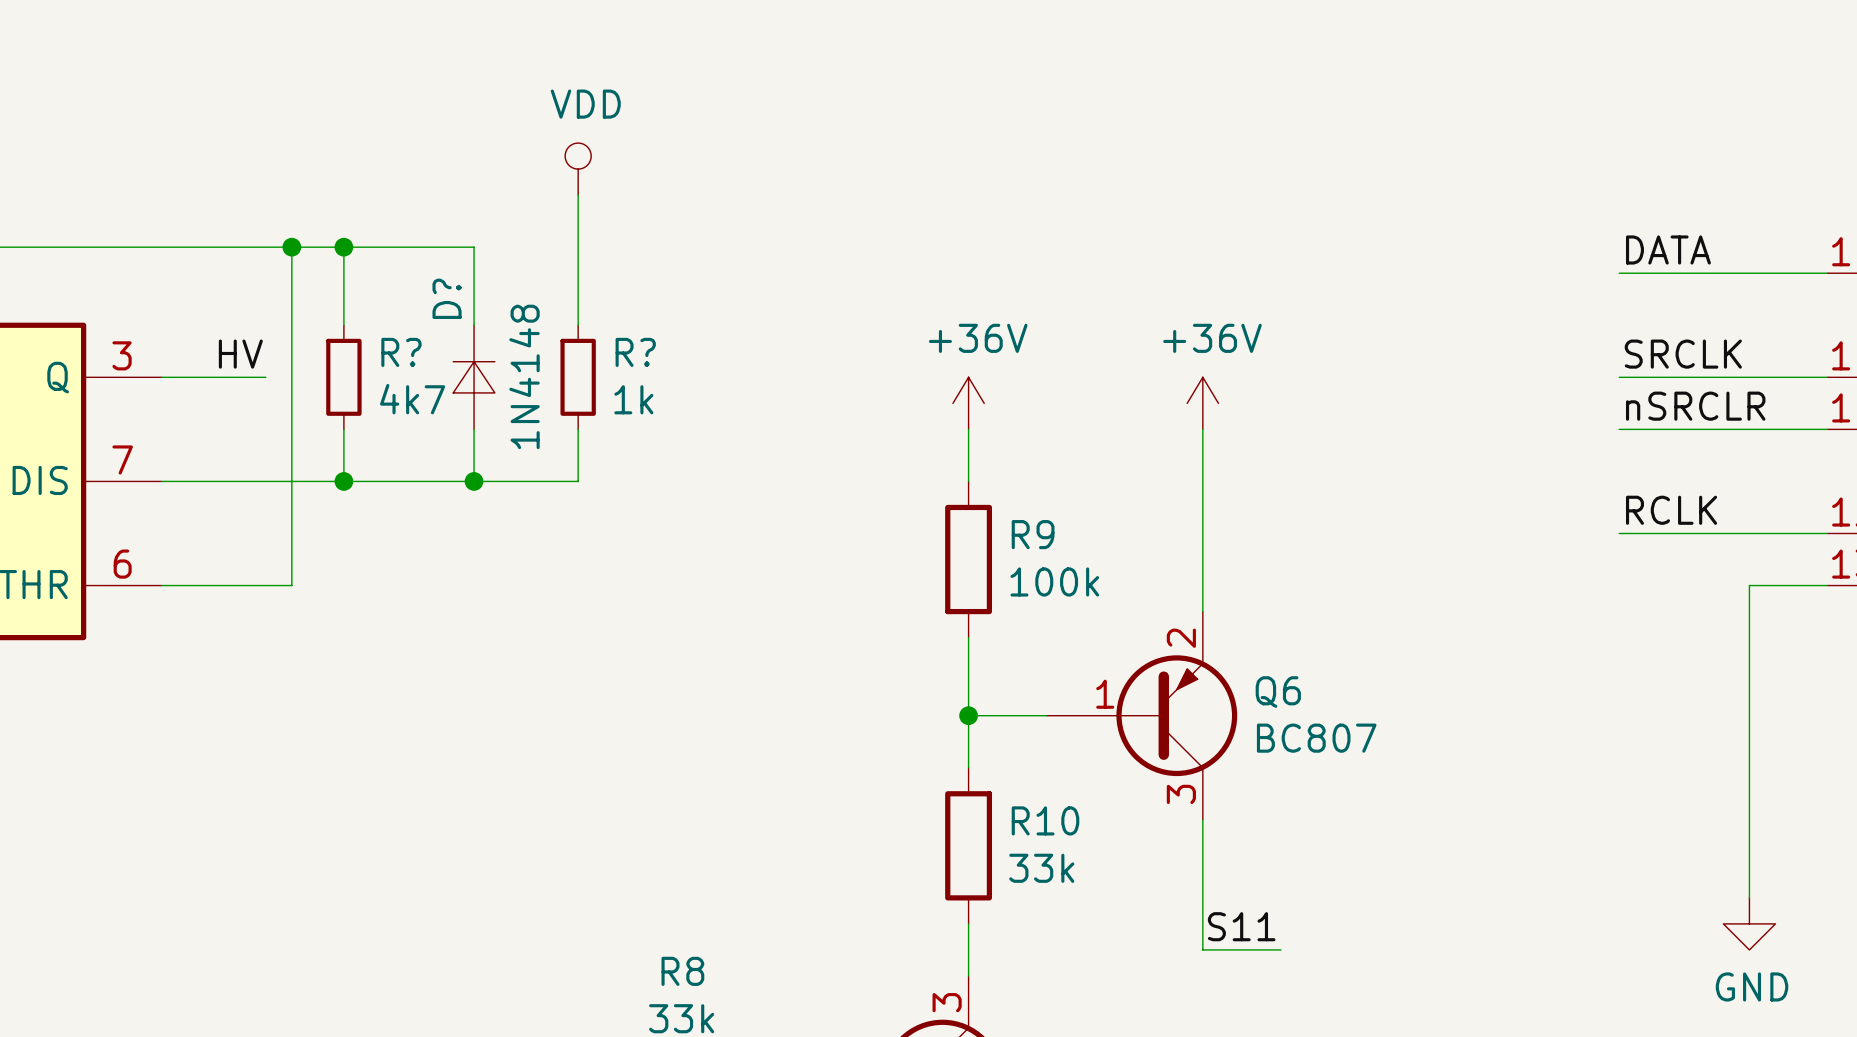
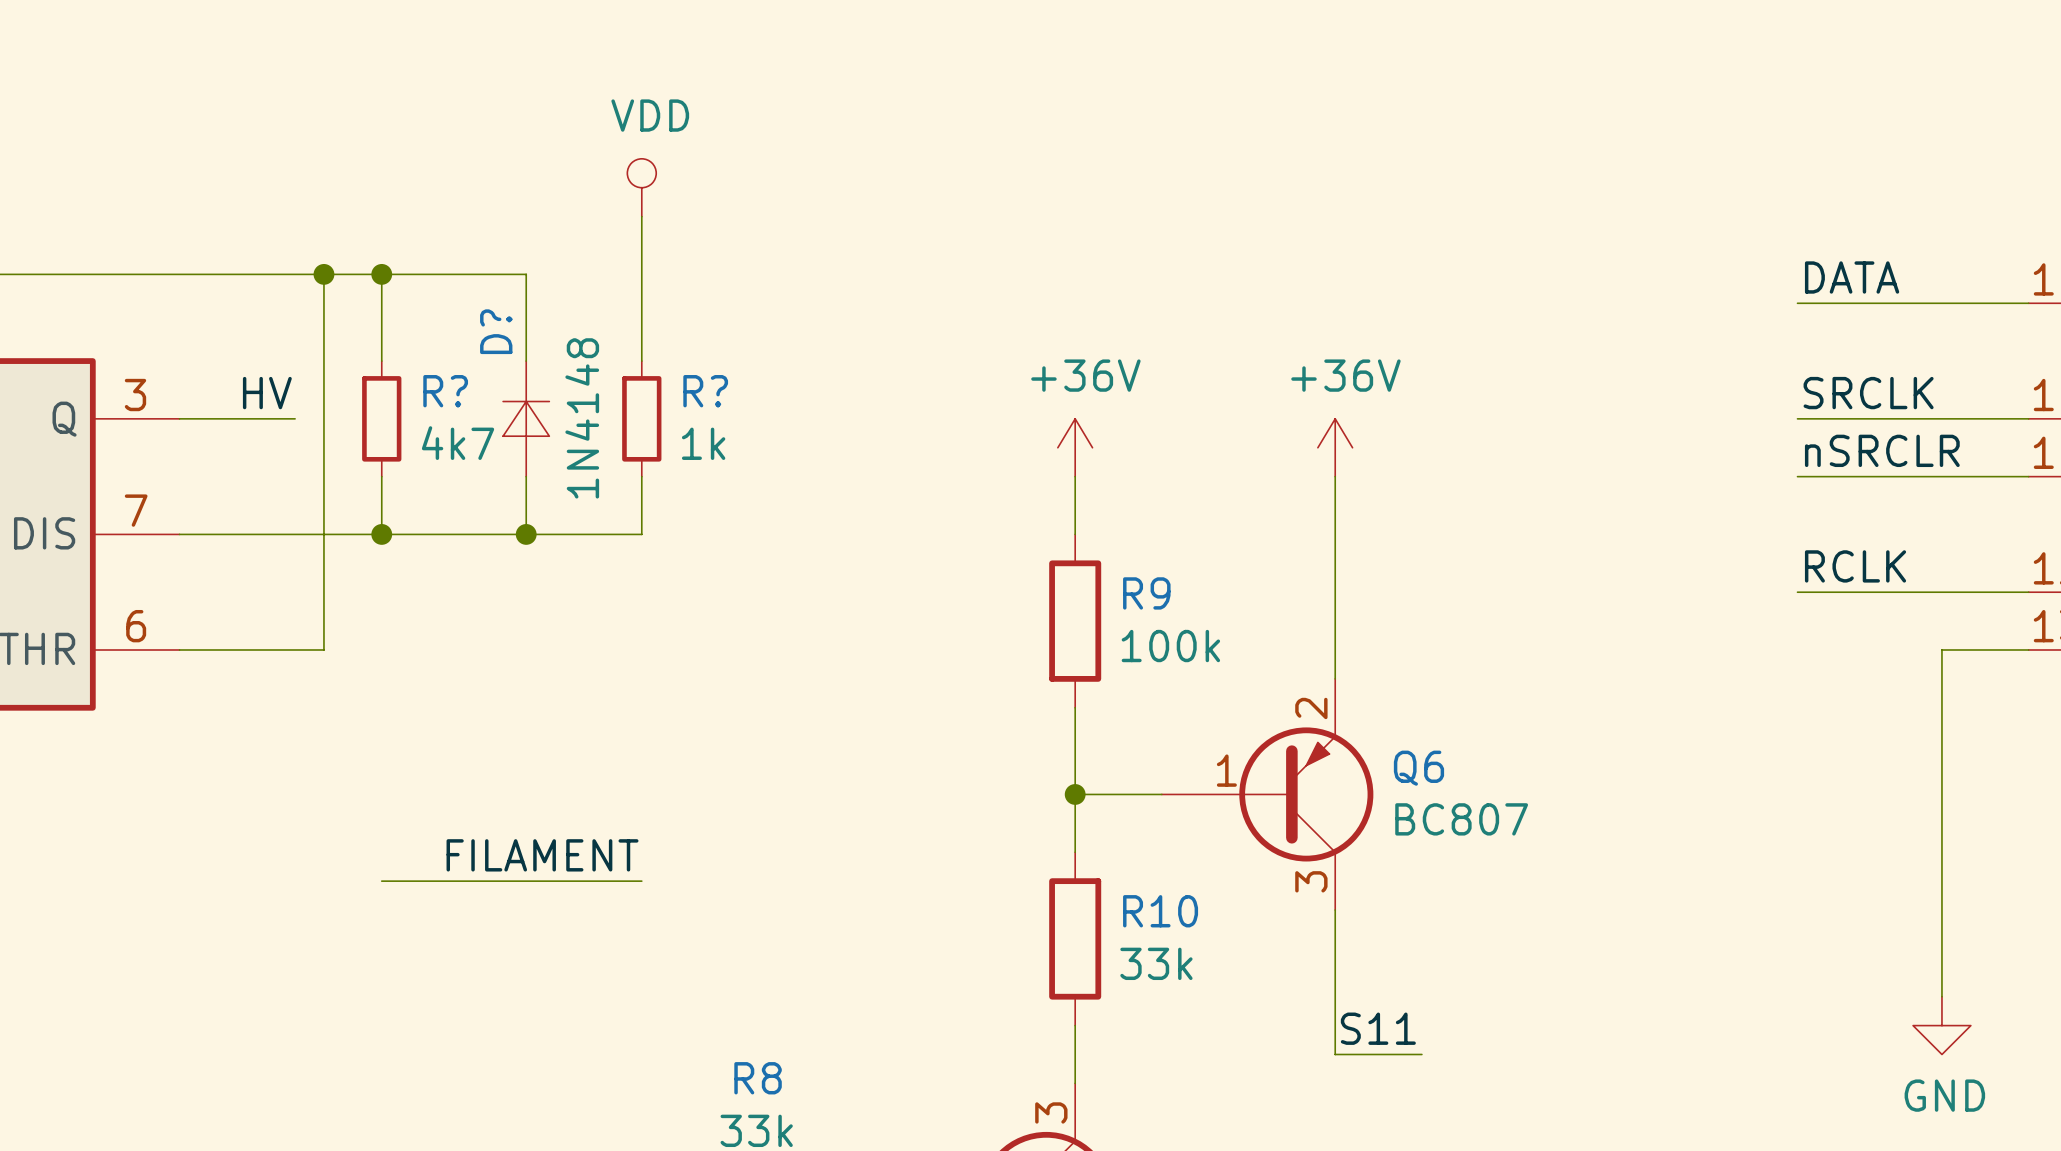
label: none -> FILAMENT (542, 855)
wire: none -> (381, 881) (641, 881)

